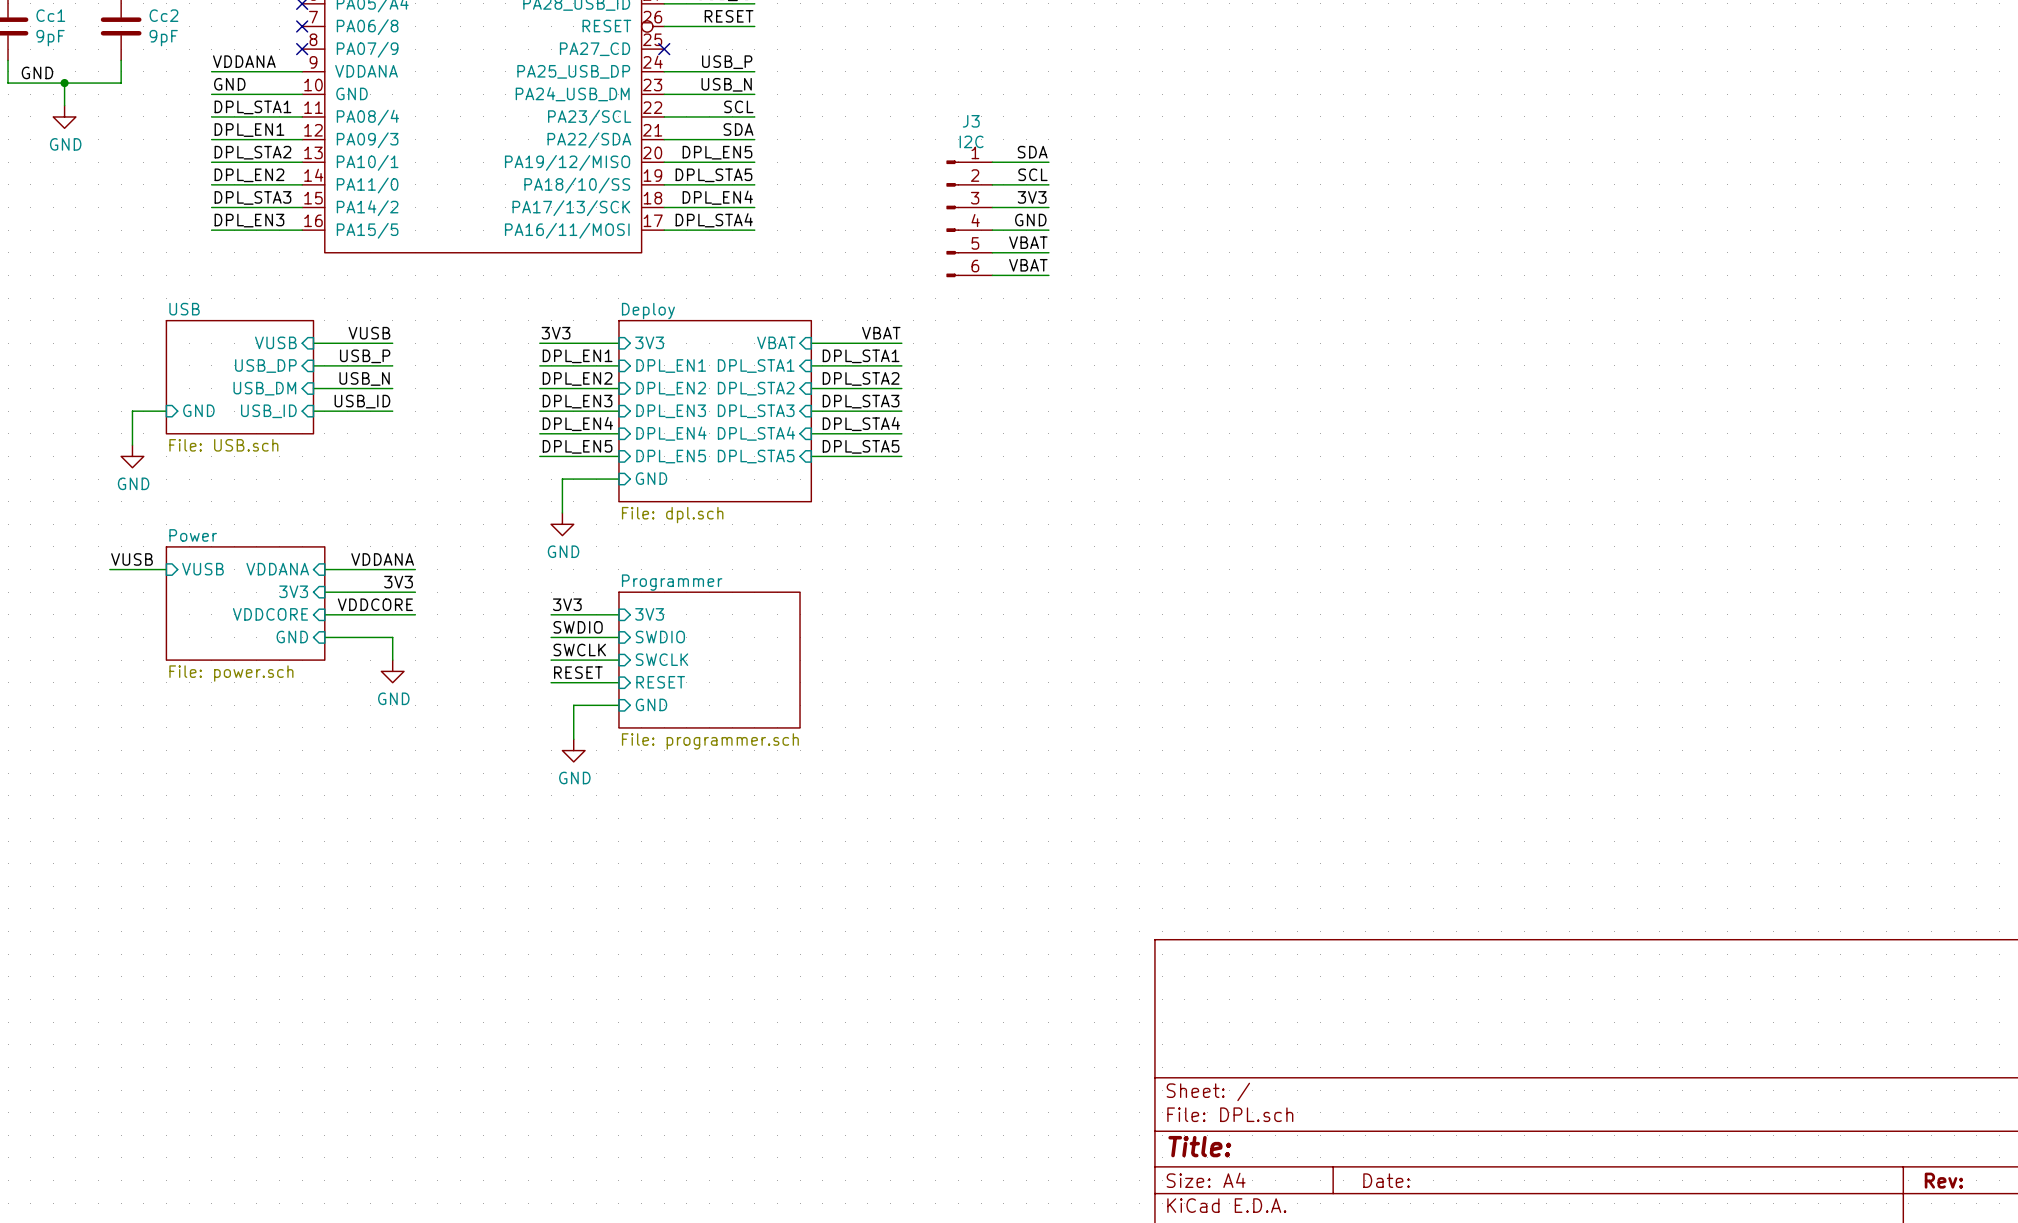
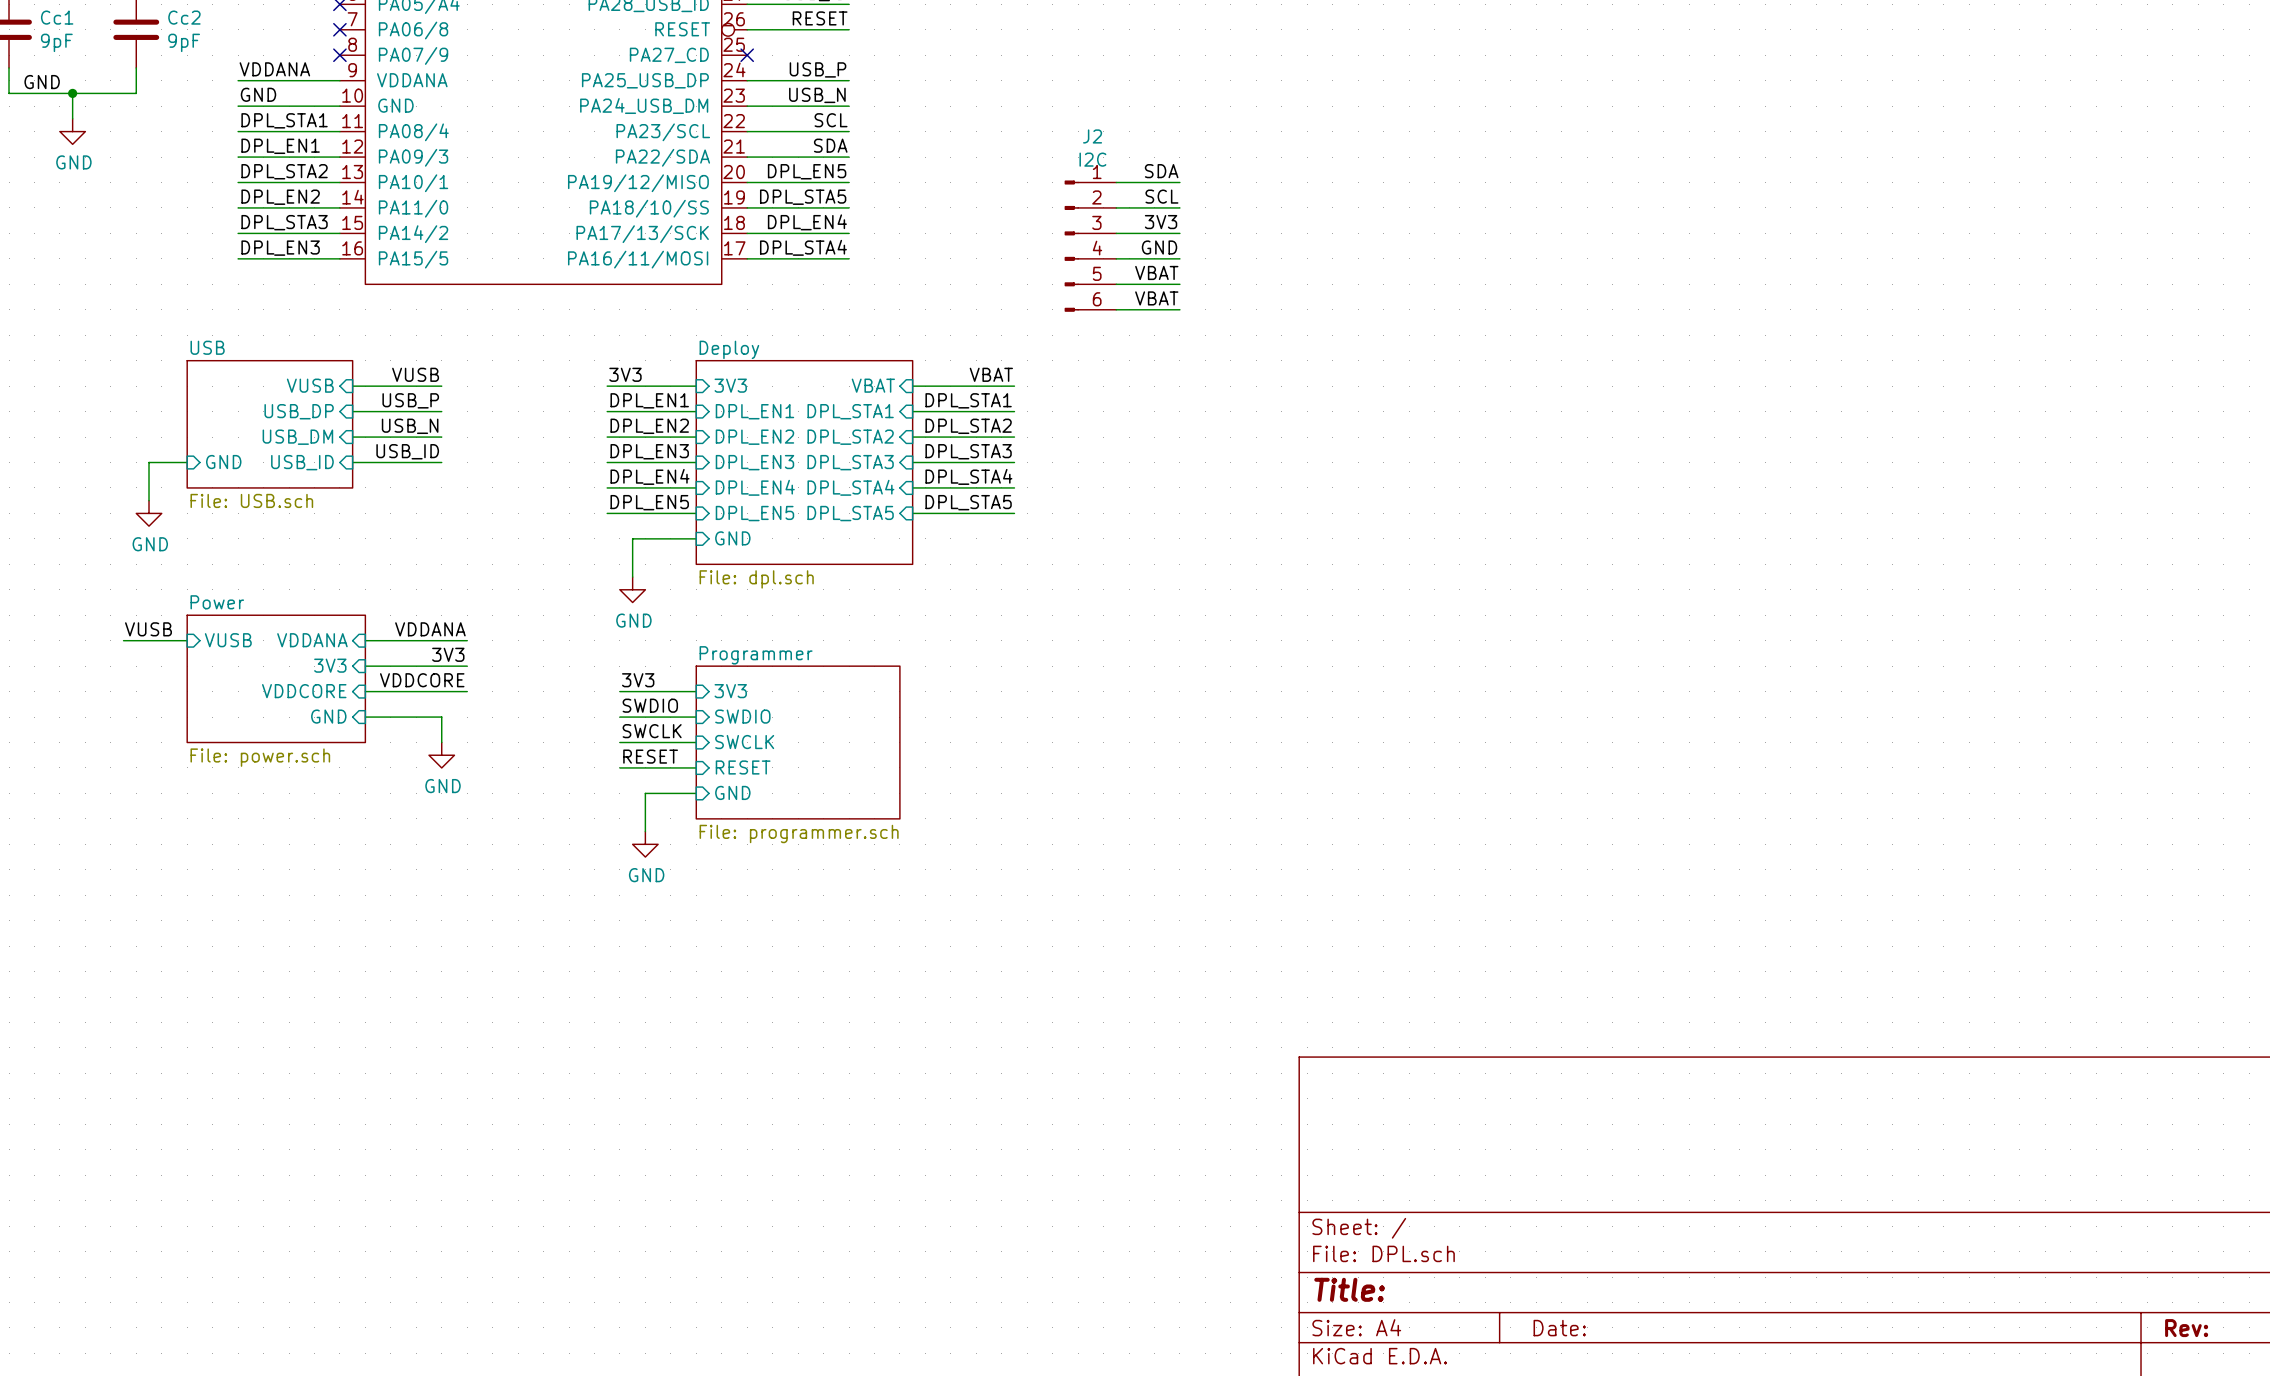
J3 name: J3 (971, 121) -> J2 (1092, 136)

